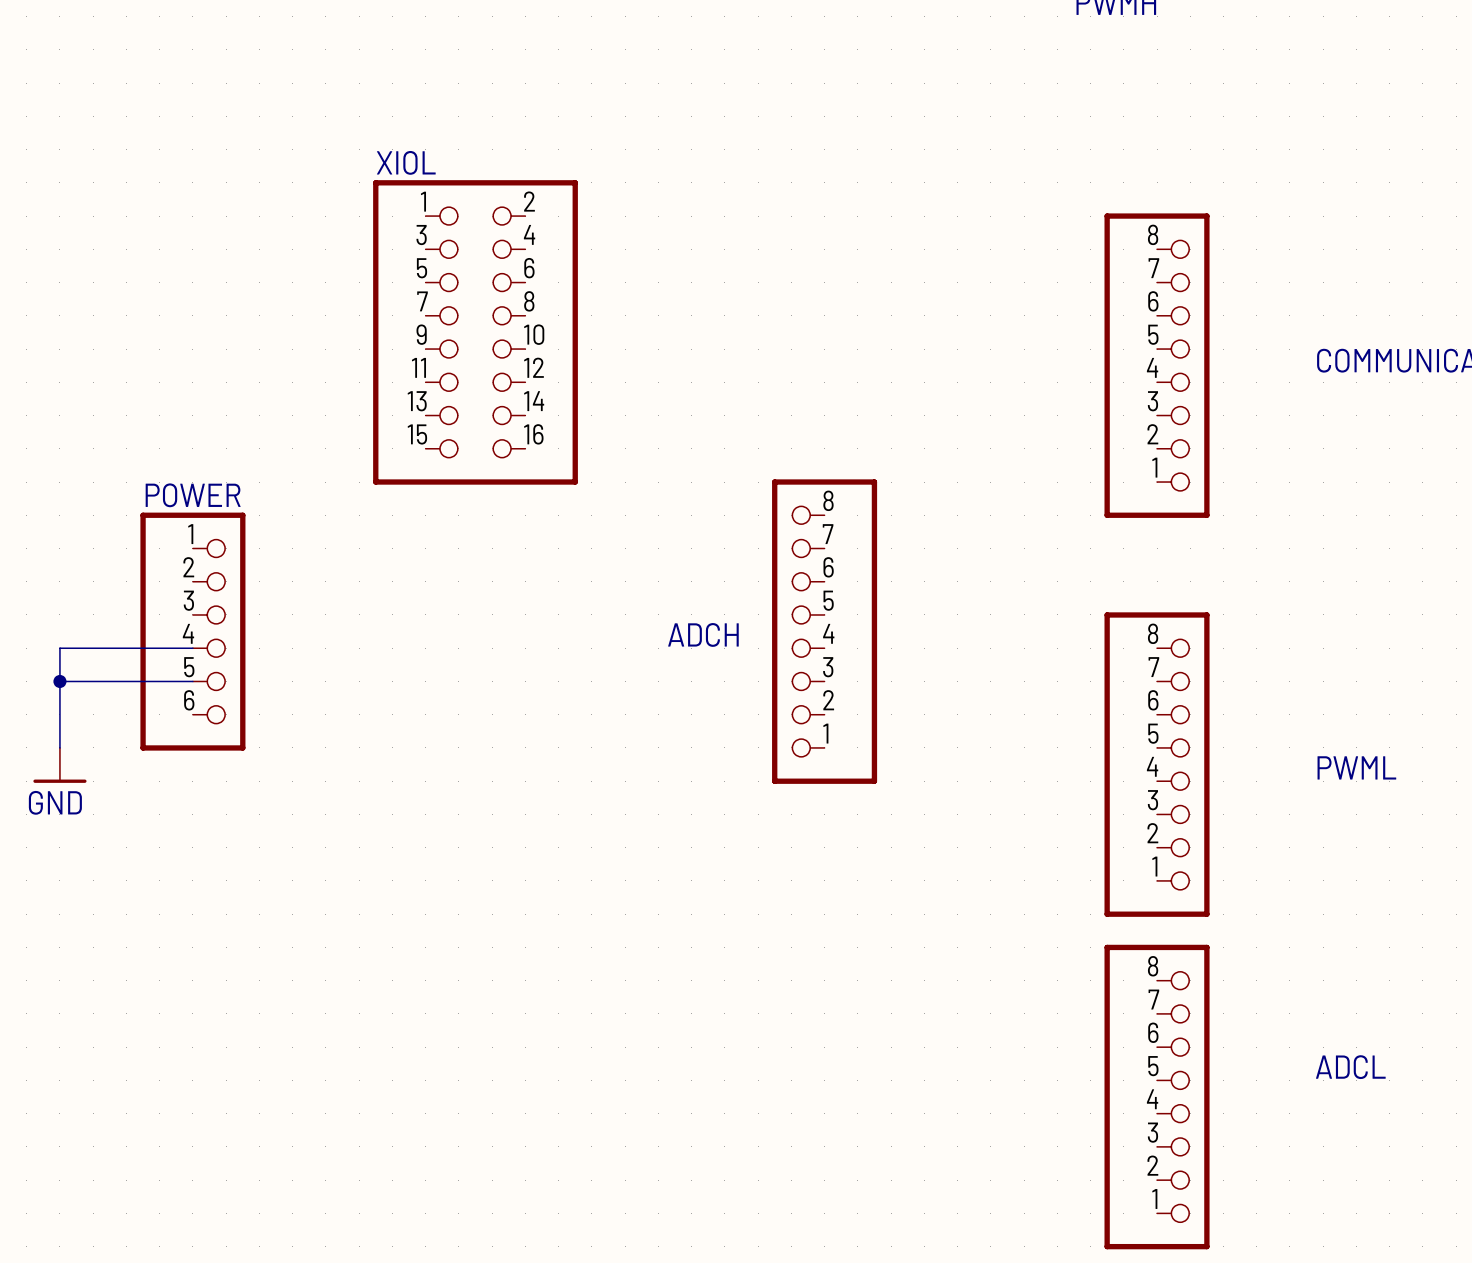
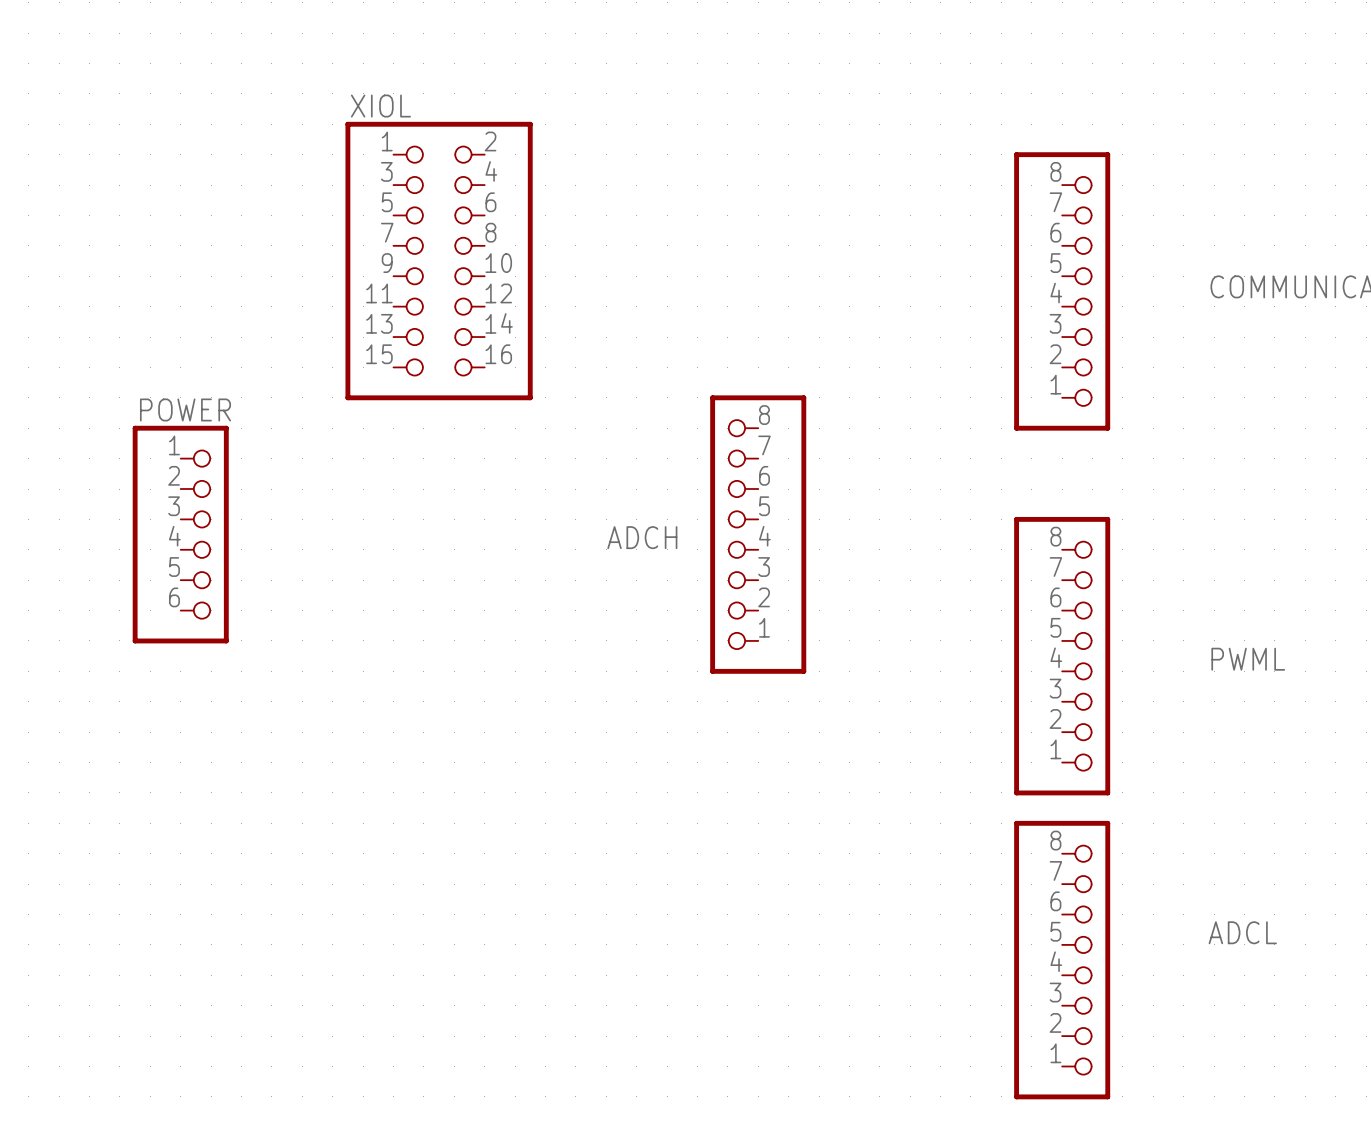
wire: (192, 648) (59, 648) (59, 747) -> none
wire: (59, 681) (192, 681) -> none
junction: (59, 681) -> none
power symbol: GND (59, 765) -> none

